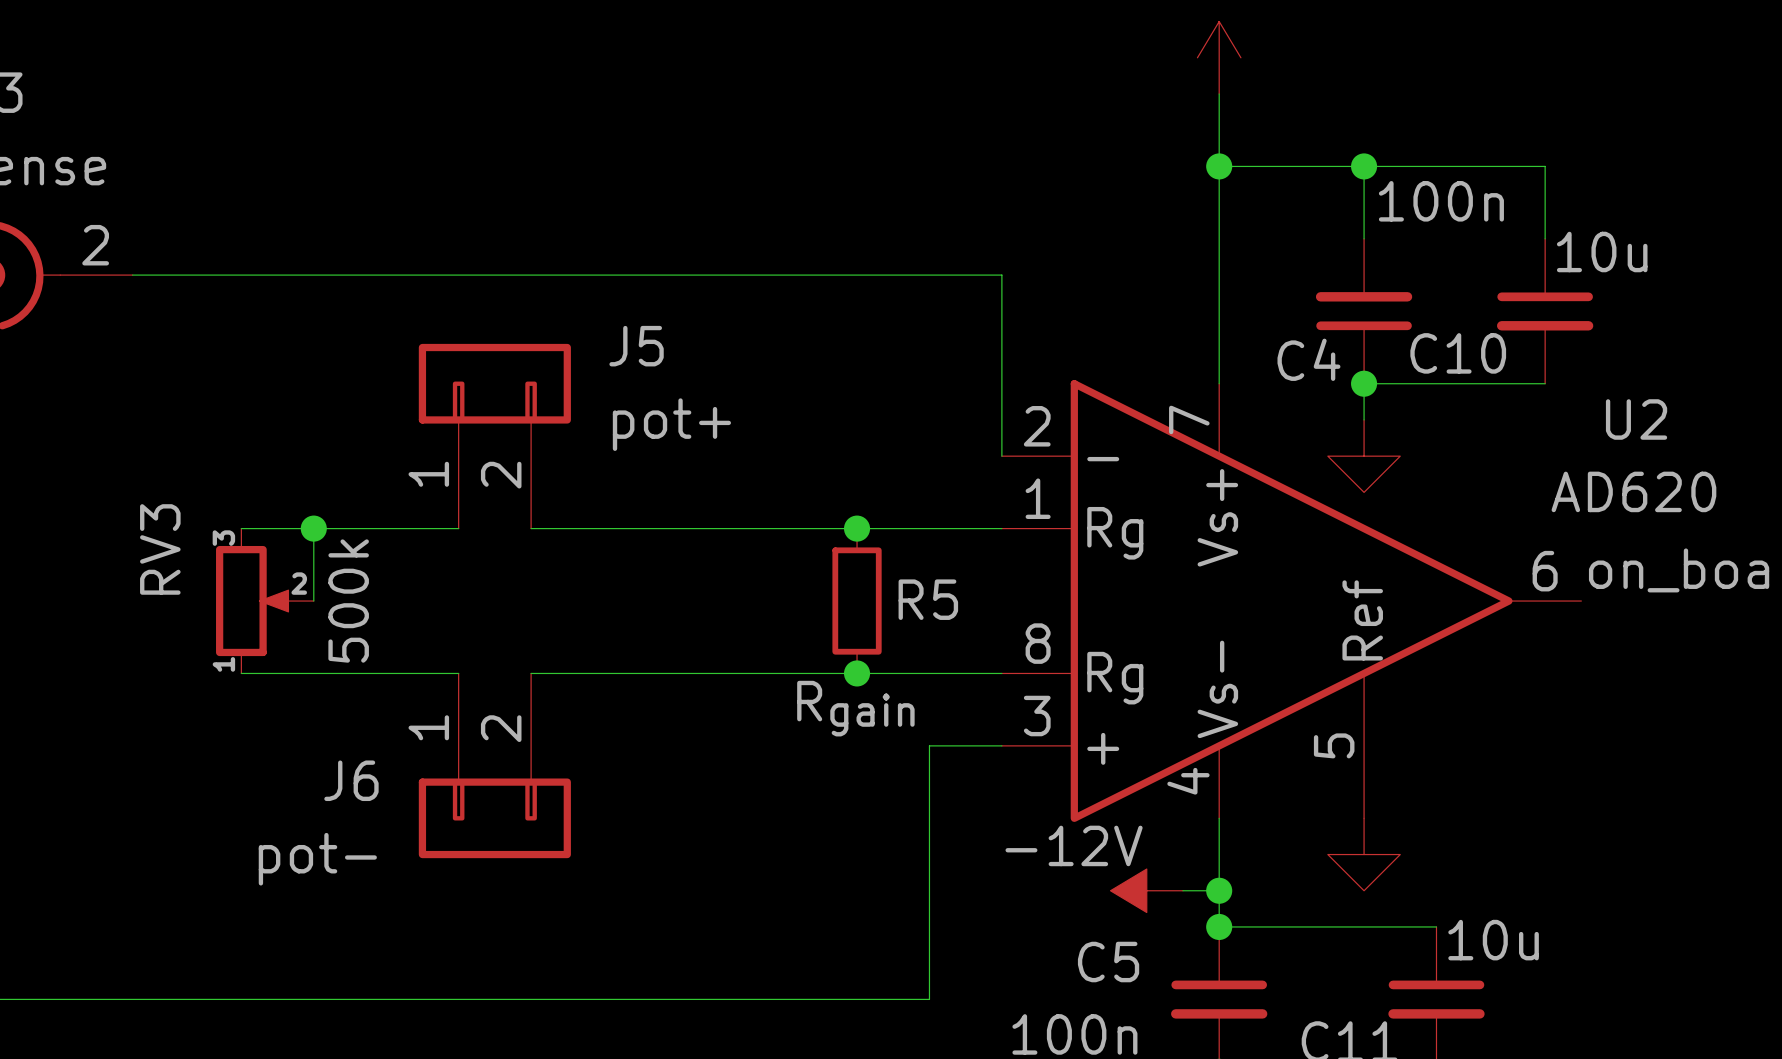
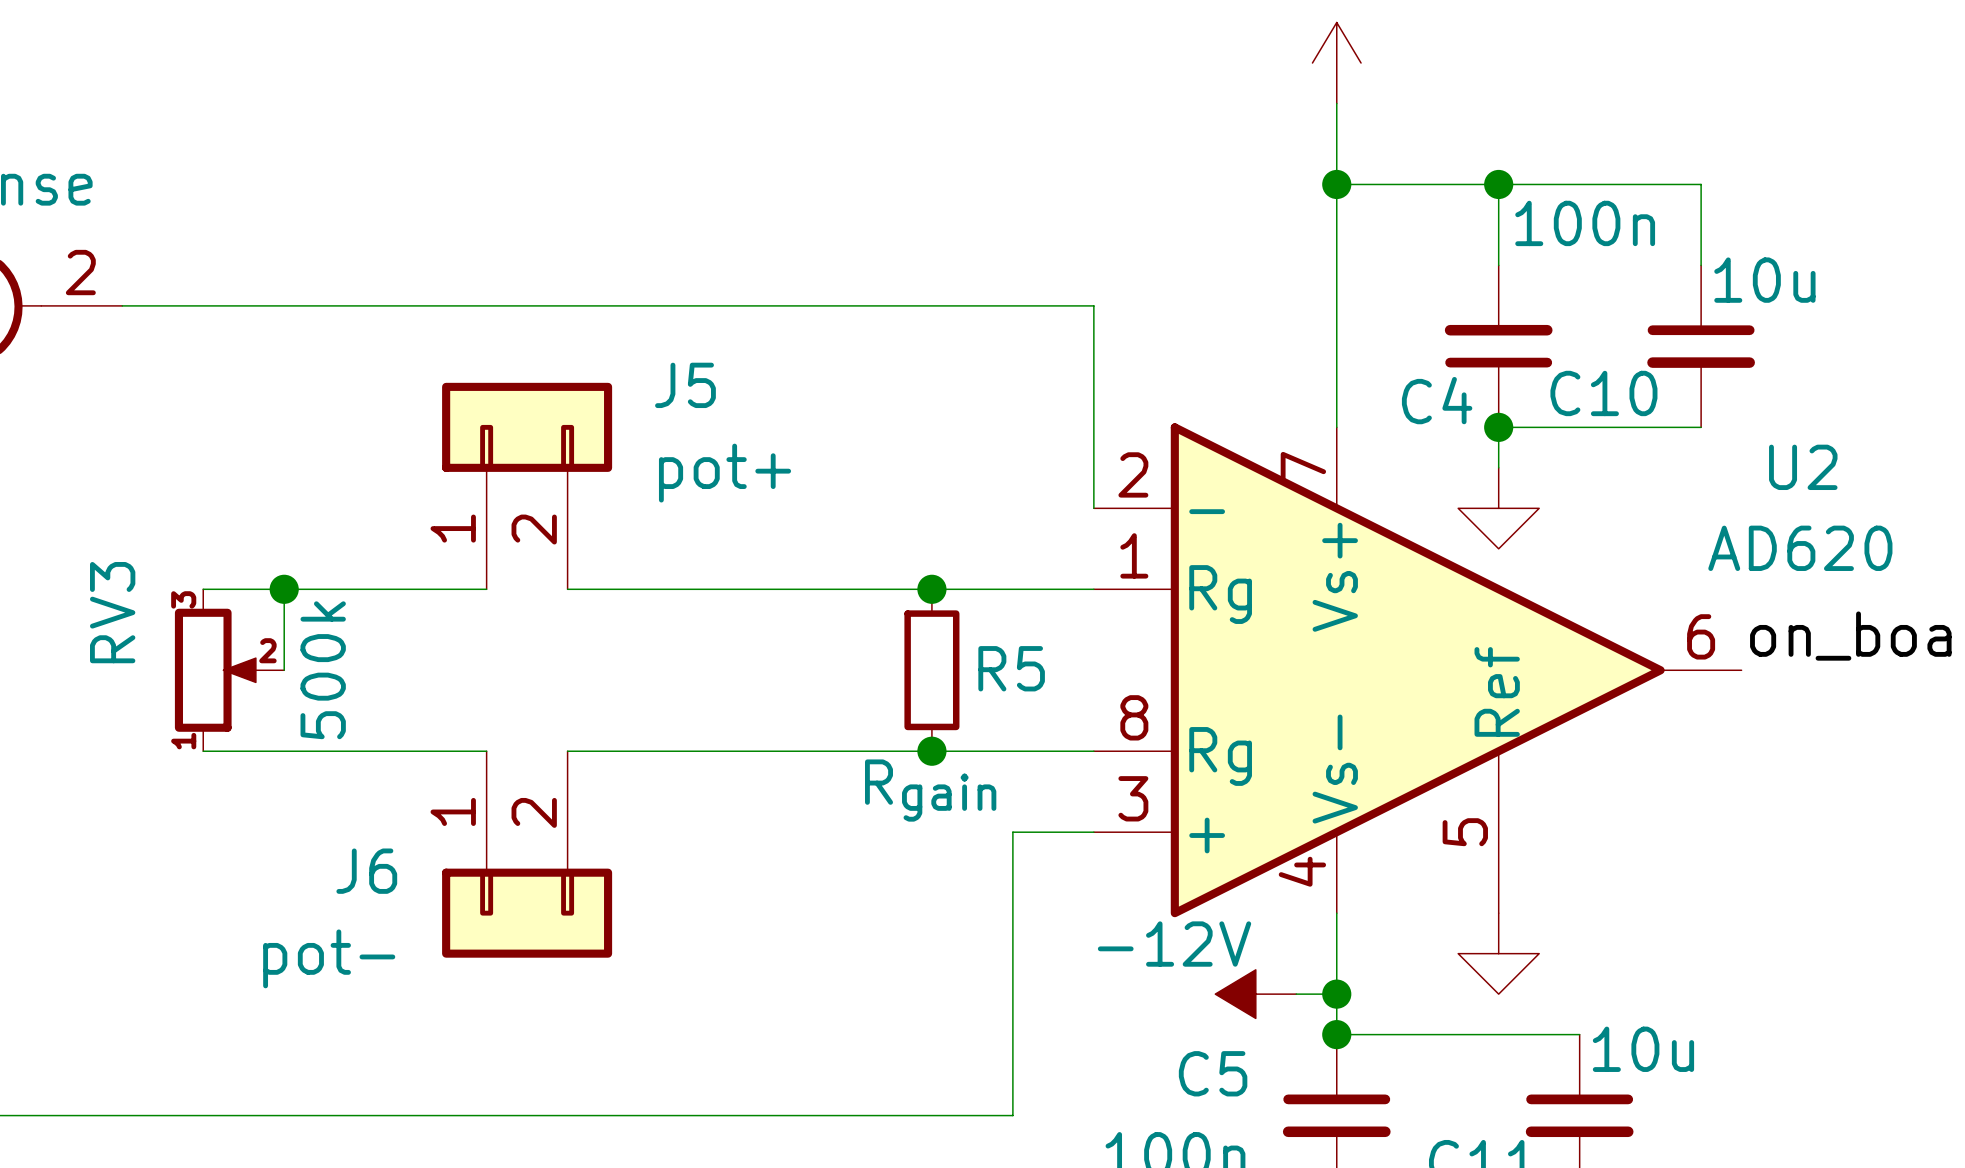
wire: none -> (203, 589) (243, 589)
wire: (313, 528) (313, 601) -> (284, 589) (284, 670)
junction position: (313, 528) -> (284, 589)
RV3 position: (264, 601) -> (229, 670)
wire: none -> (203, 751) (243, 751)

